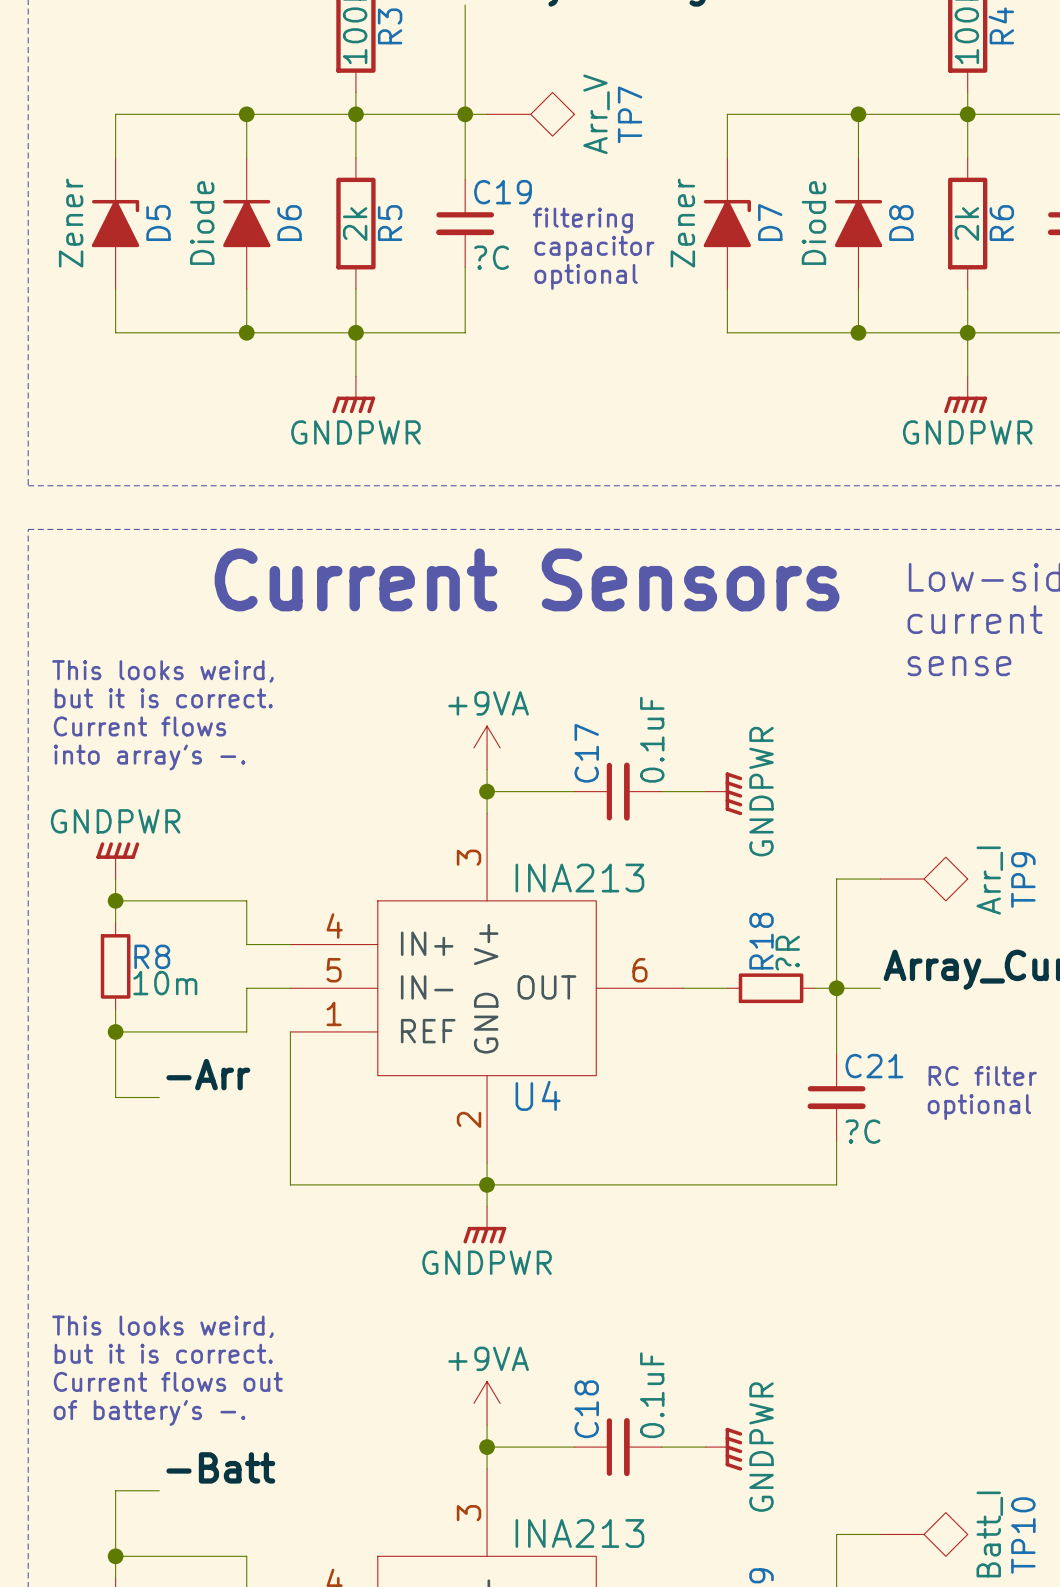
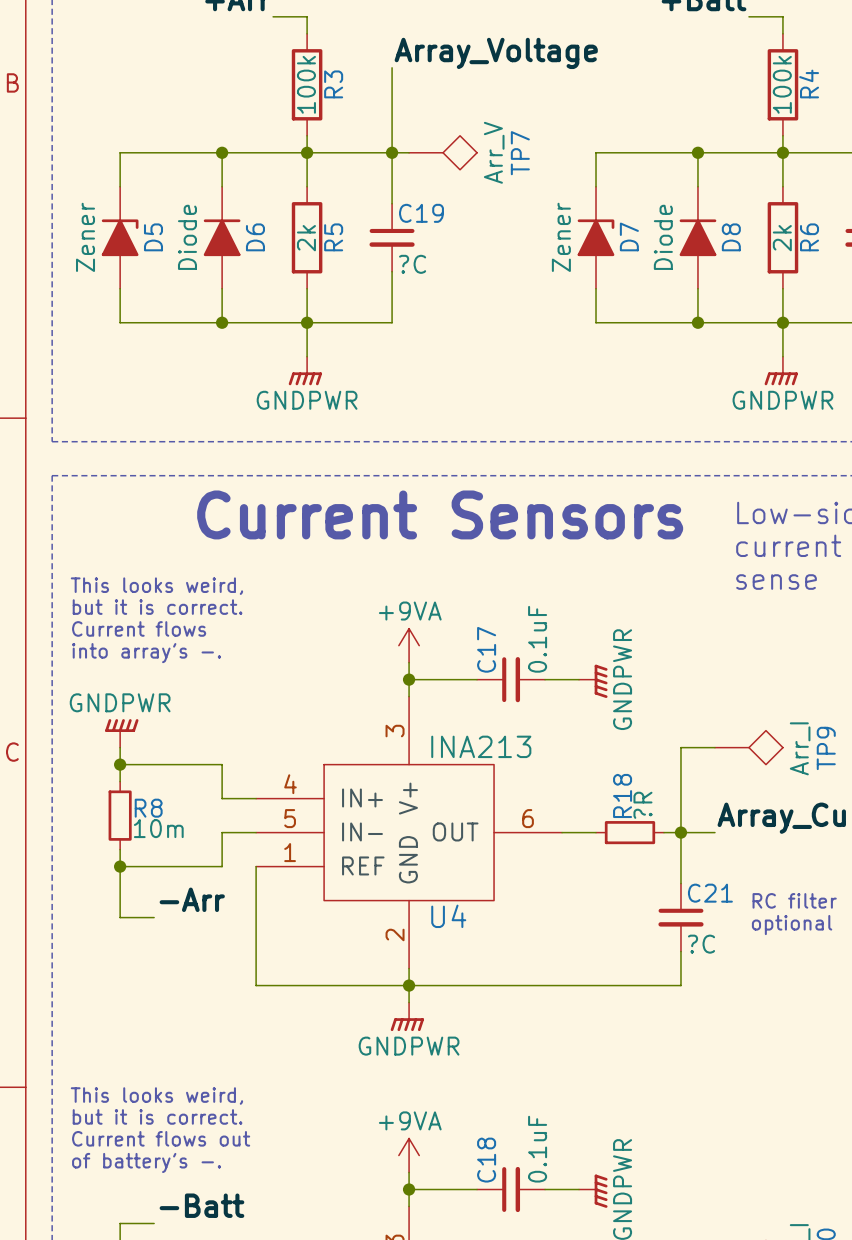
text: filtering (582, 220) -> none
text: capacitor (594, 248) -> none
text: optional (586, 276) -> none

